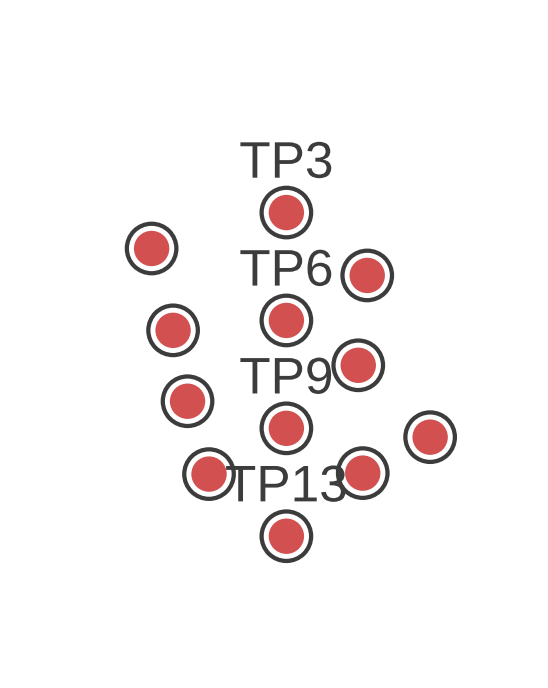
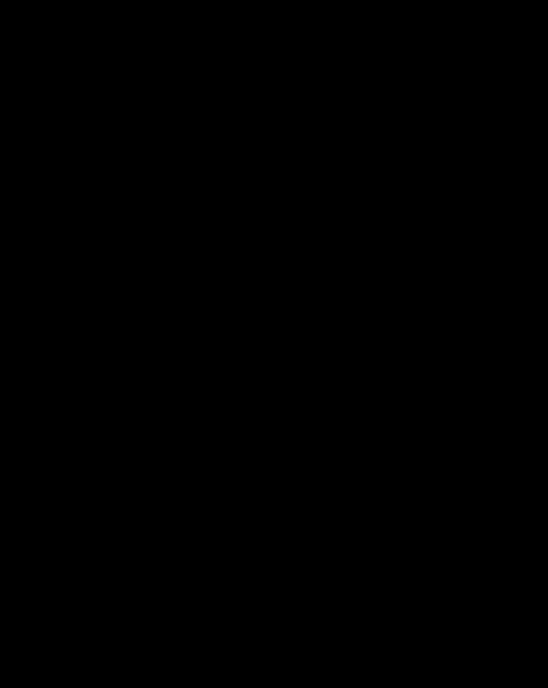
TP3: (286, 212) -> none
part: (151, 248) -> none
part: (367, 275) -> none
TP6: (286, 320) -> none
part: (173, 330) -> none
part: (358, 365) -> none
part: (187, 401) -> none
TP9: (286, 428) -> none
part: (430, 437) -> none
part: (362, 473) -> none
part: (209, 474) -> none
TP13: (286, 536) -> none

